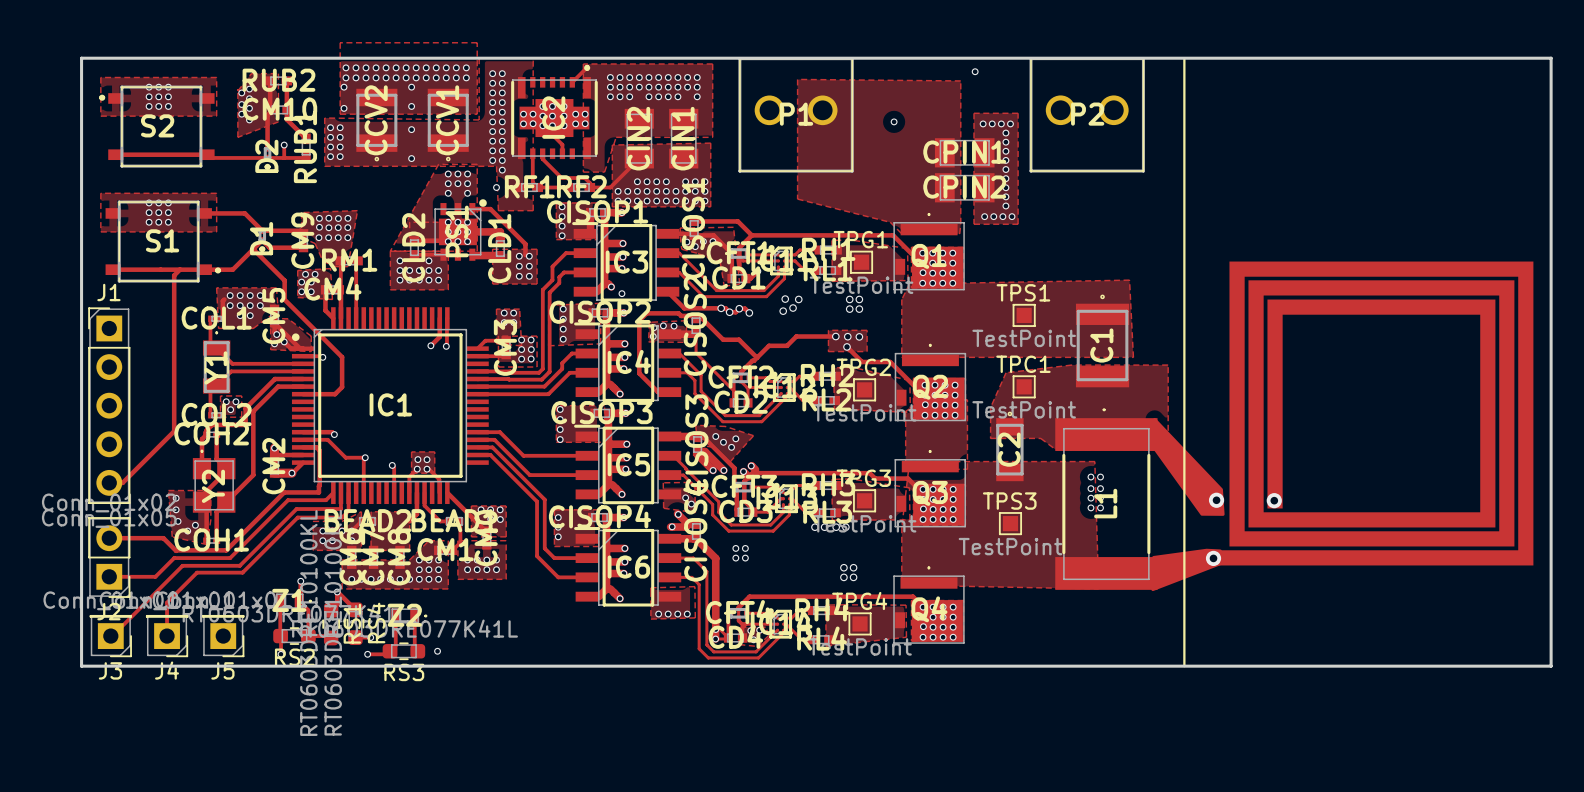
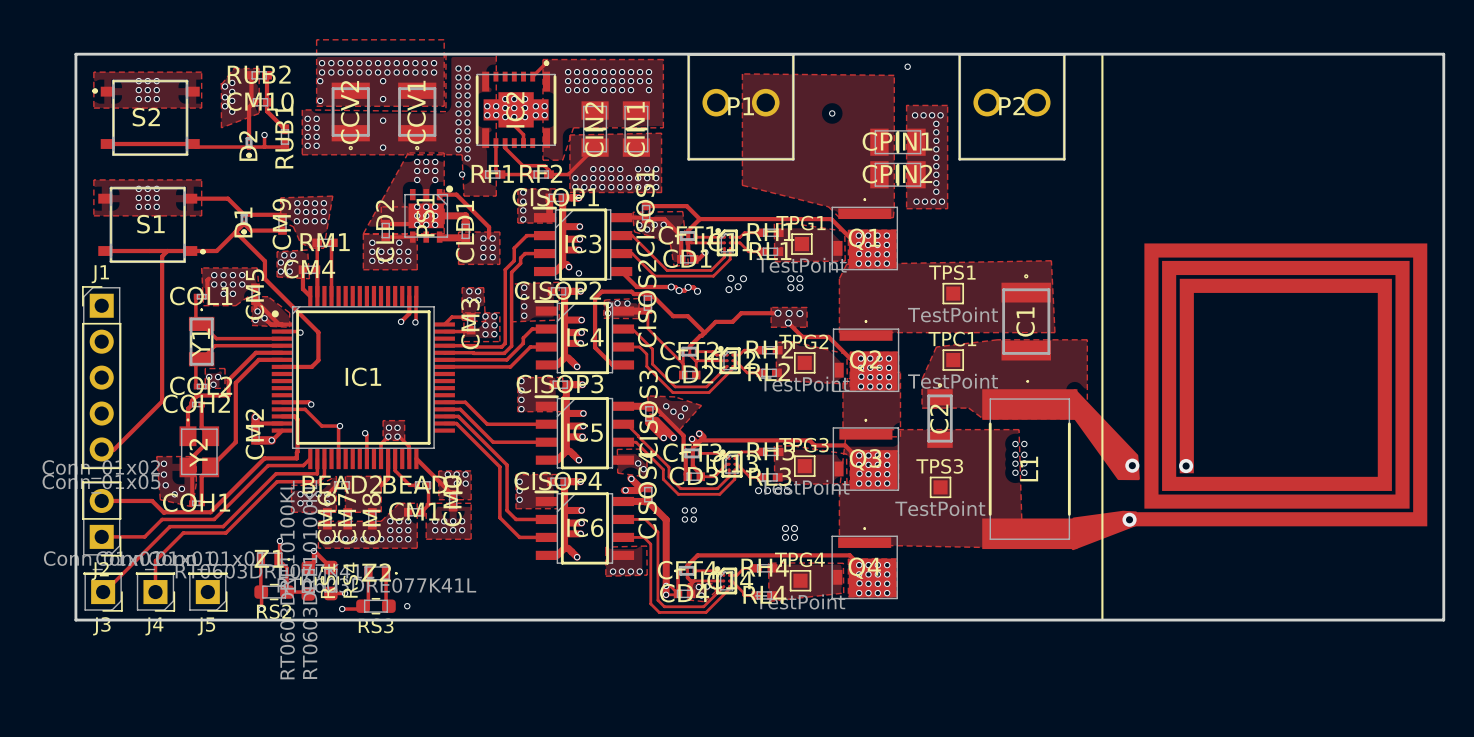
via: (226, 401) -> none
via: (235, 401) -> none
via: none -> (209, 377)
via: none -> (218, 377)
via: (230, 409) -> none
via: none -> (213, 384)

